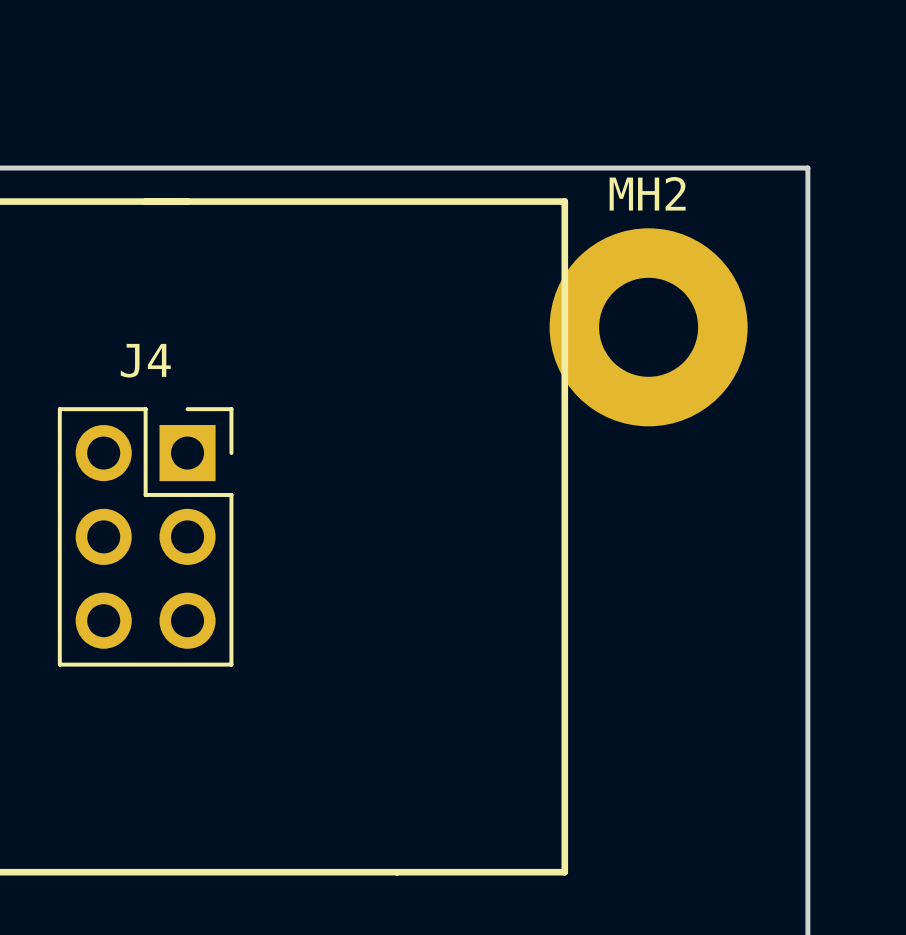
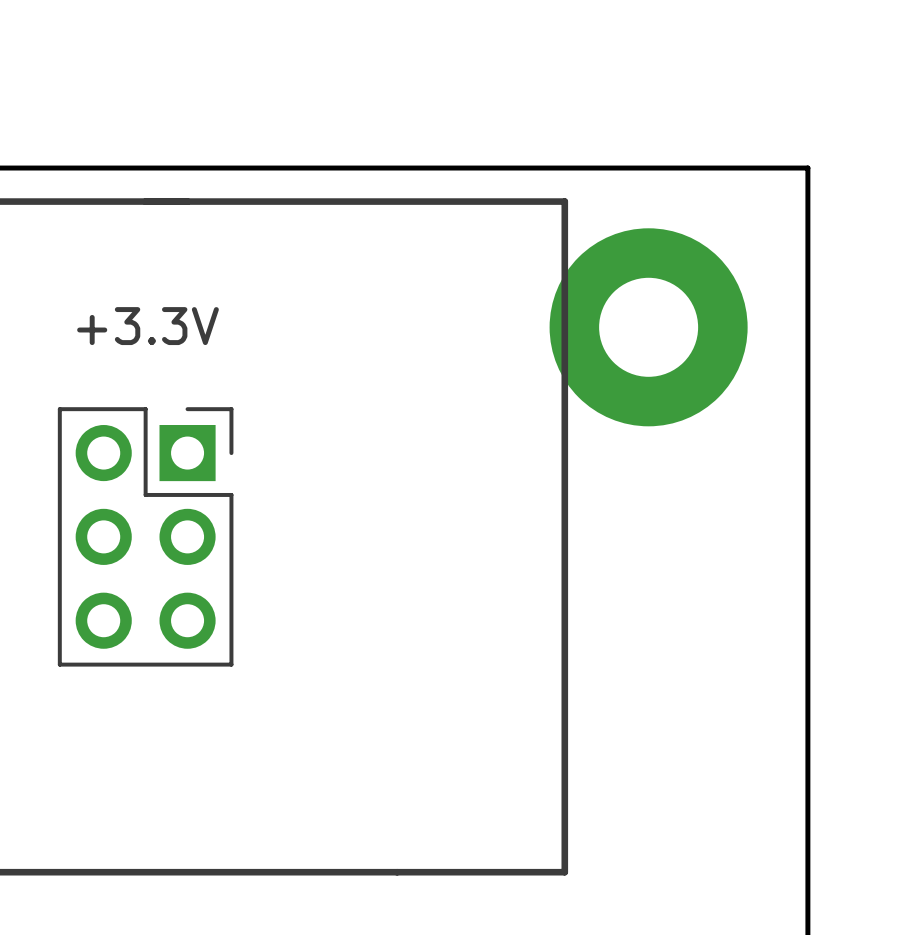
MH2 name: MH2 (647, 193) -> none
J4 name: J4 (145, 360) -> +3.3V (147, 326)

